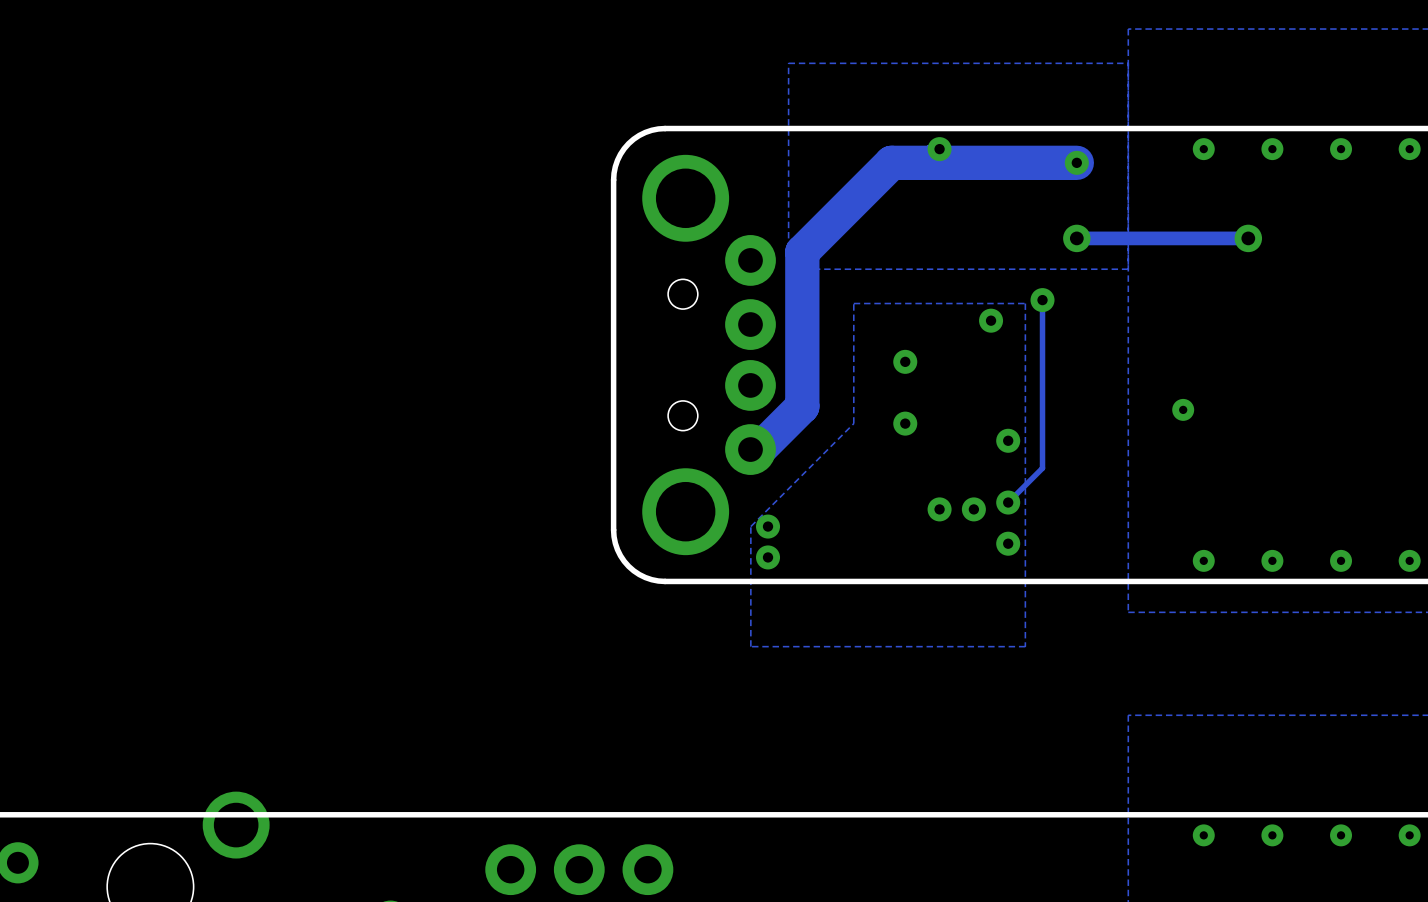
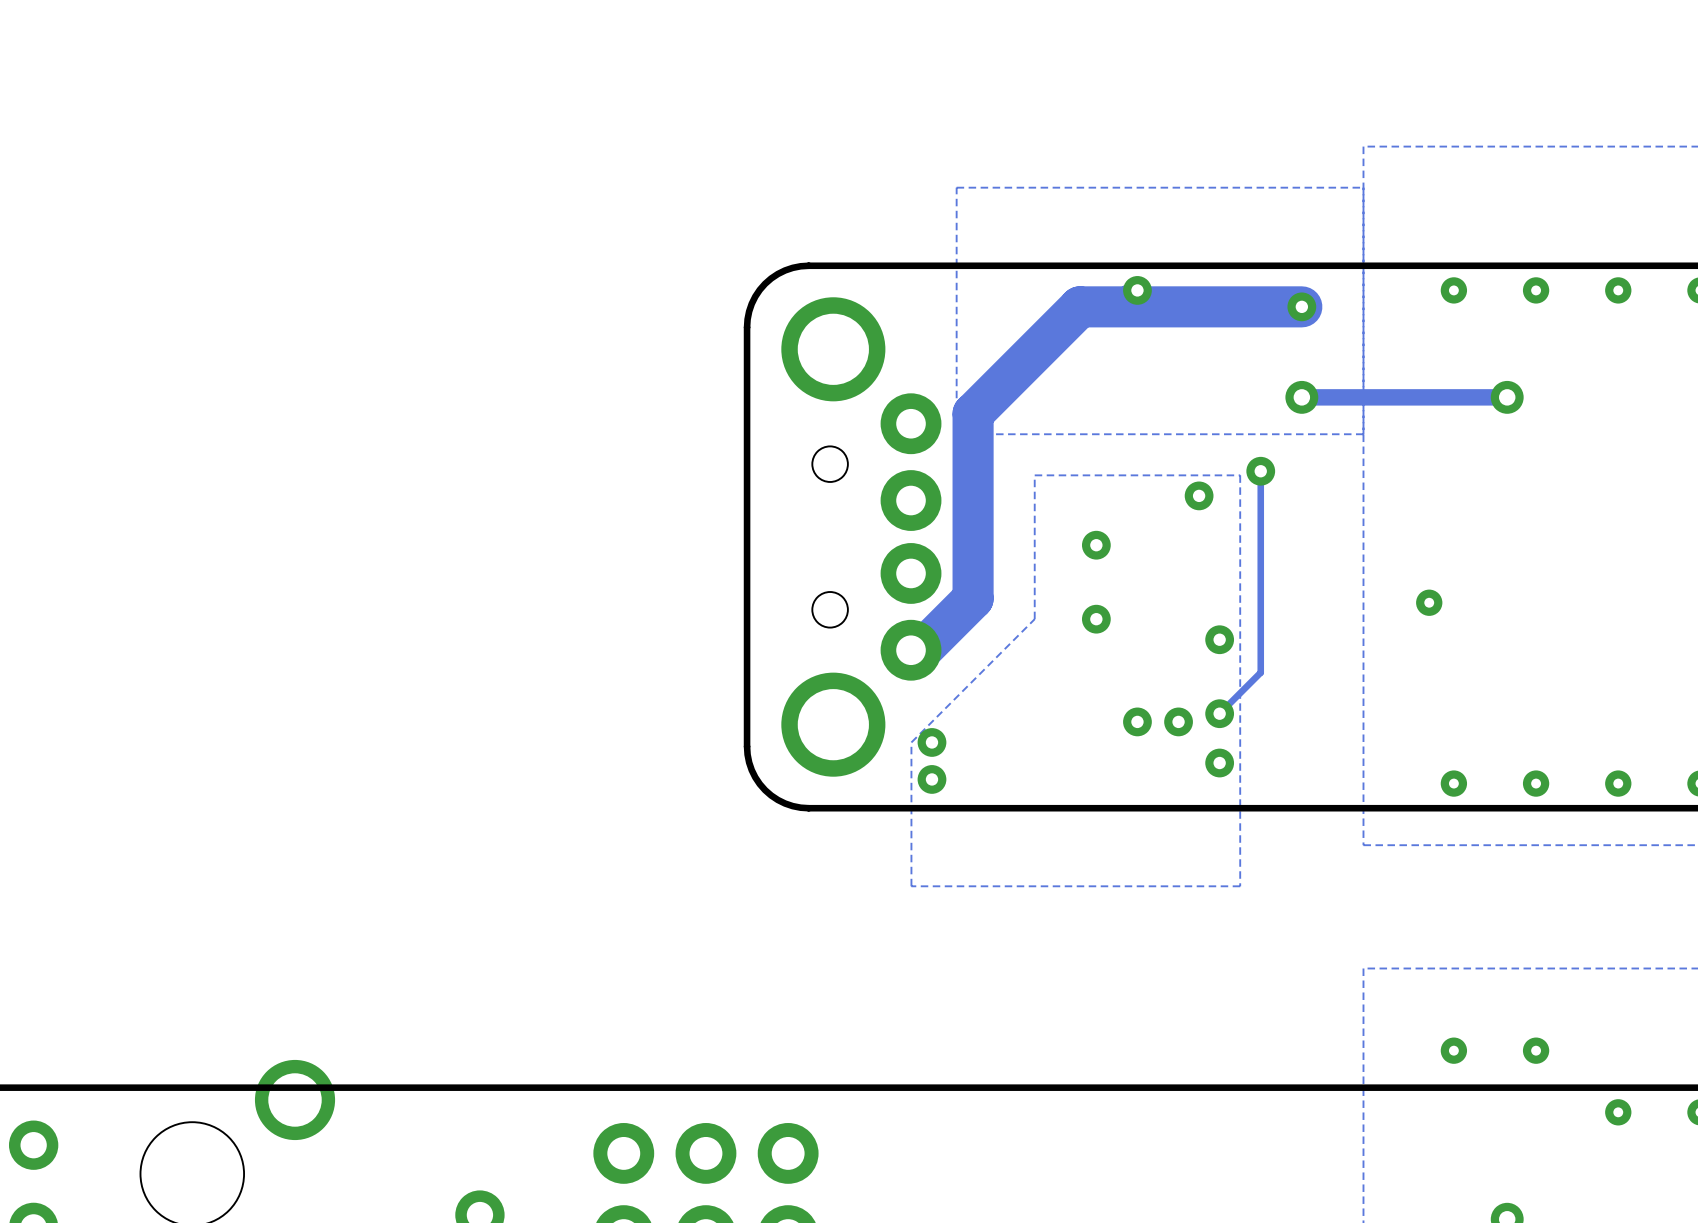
via: none -> (1453, 1050)
via: none -> (1536, 1050)
via: (1203, 835) -> none
via: (1272, 835) -> none

